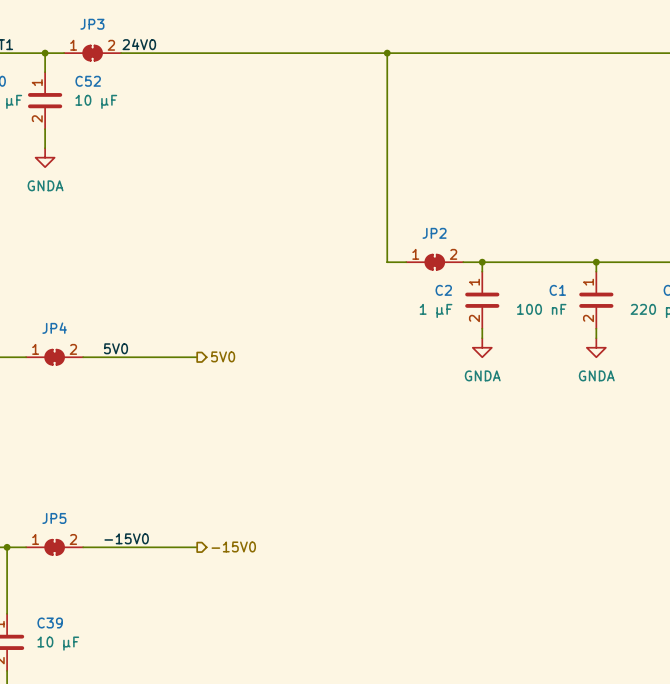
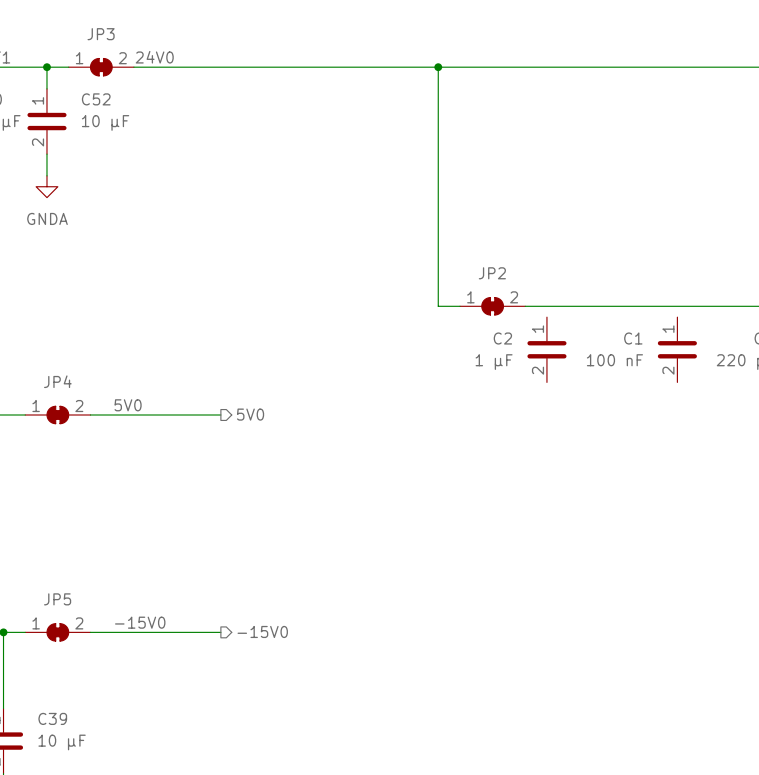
wire: (482, 262) (482, 271) -> none
junction: (482, 262) -> none
wire: (596, 262) (596, 271) -> none
junction: (596, 262) -> none
wire: (482, 328) (482, 338) -> none
wire: (596, 328) (596, 338) -> none
power symbol: GNDA (482, 347) -> none
power symbol: GNDA (596, 347) -> none

